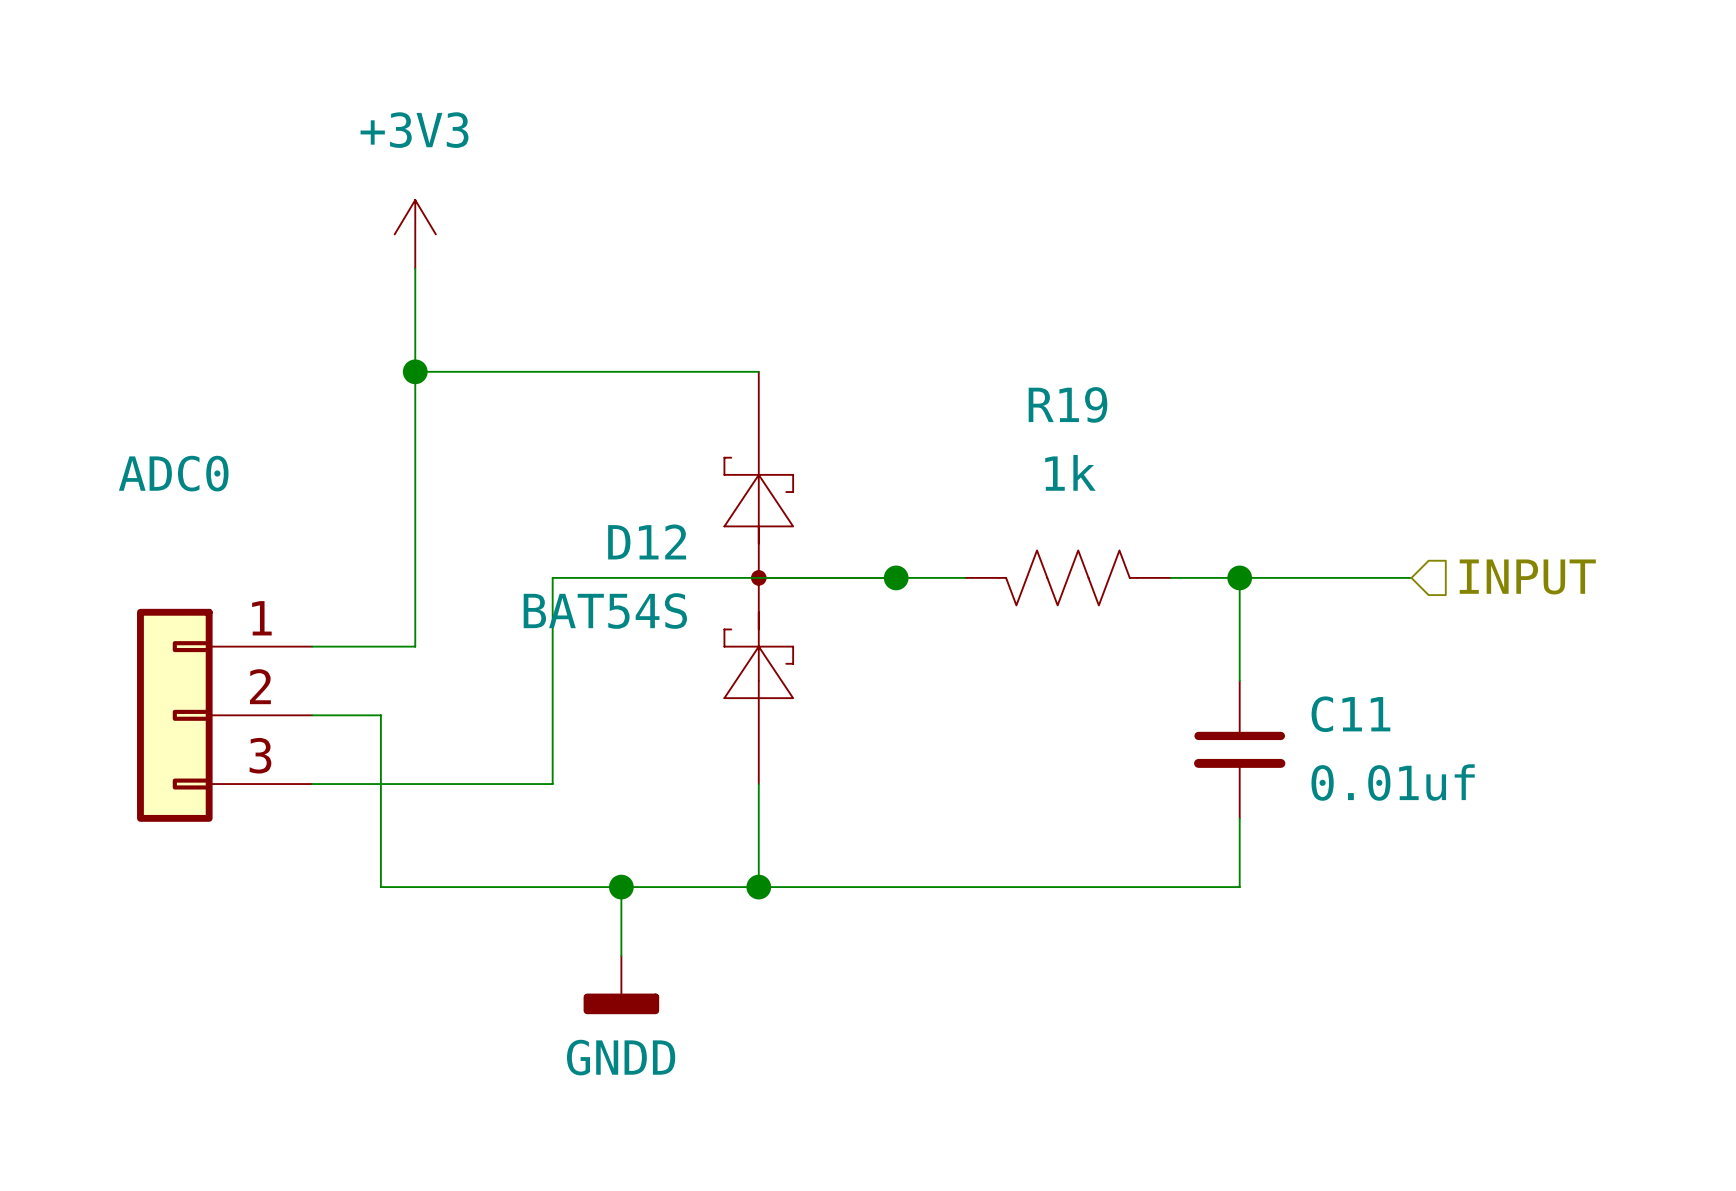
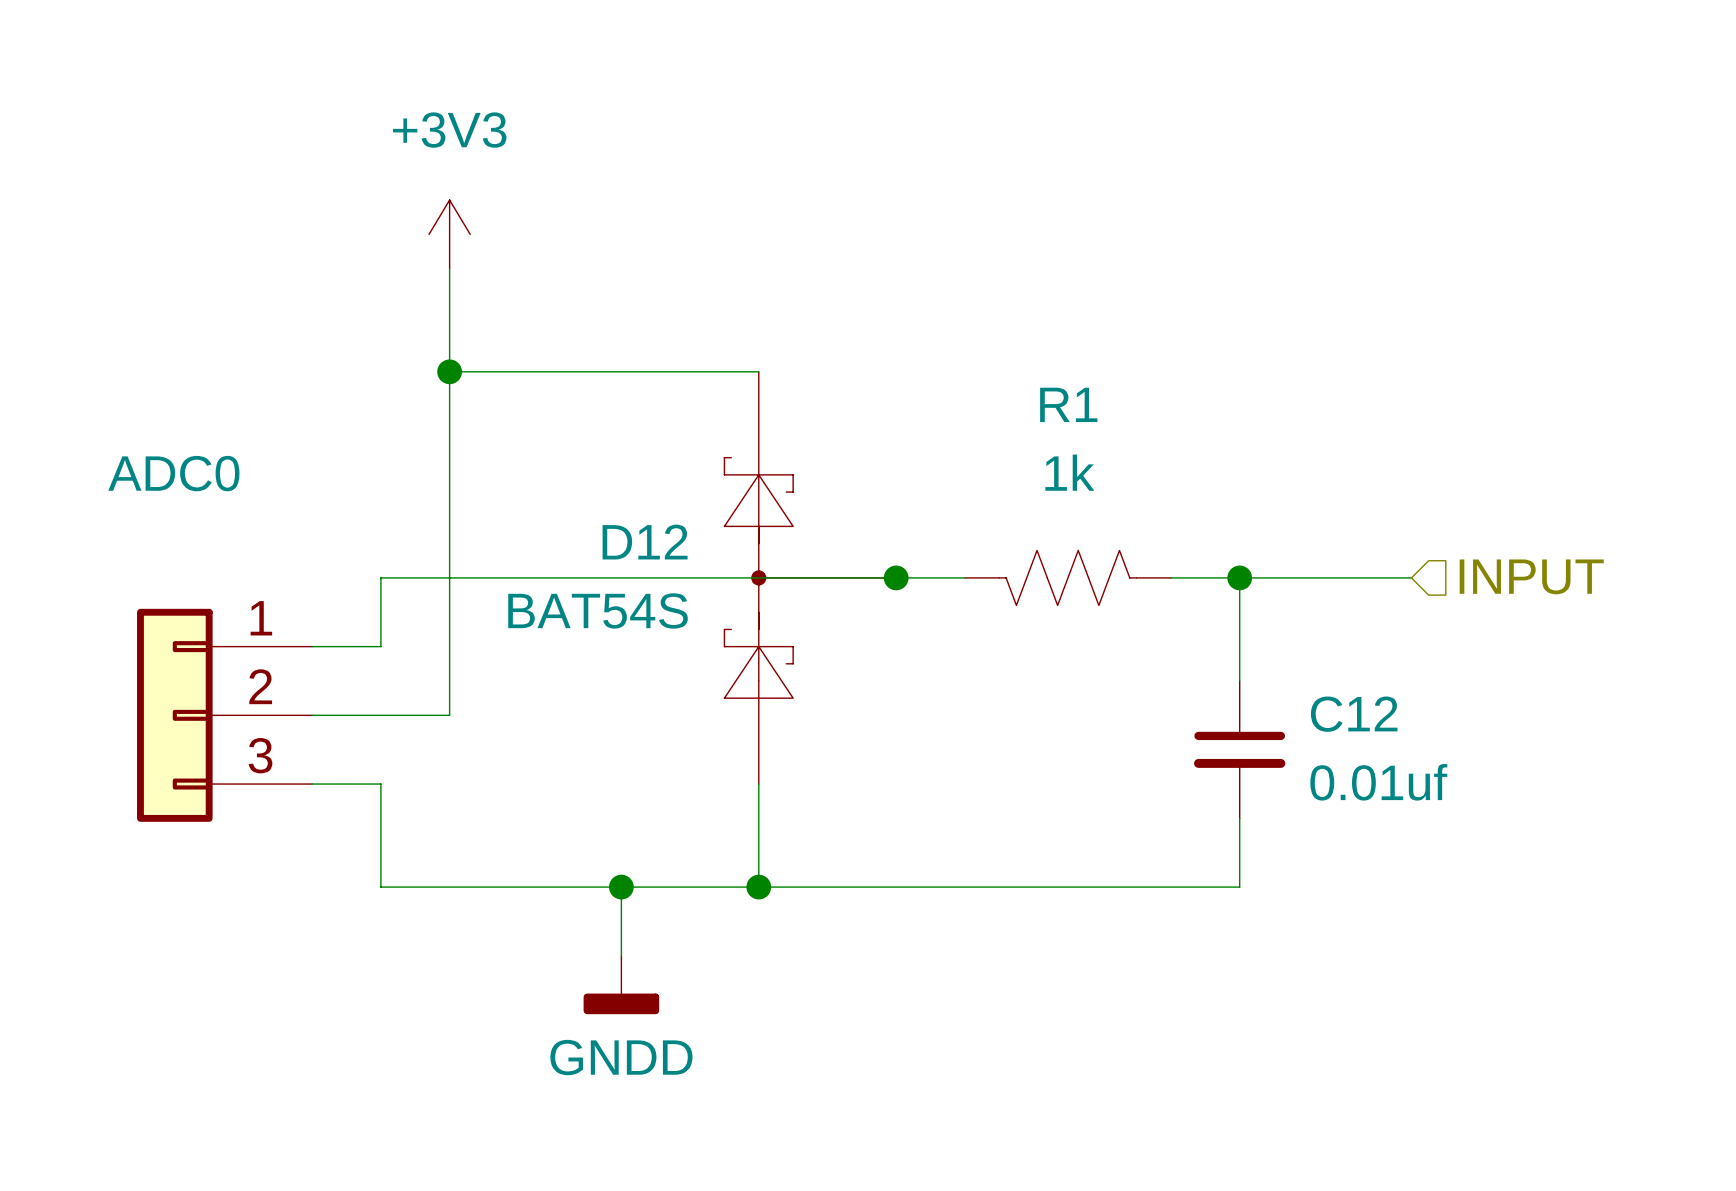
power symbol position: +3V3 (415, 234) -> +3V3 (449, 234)
wire: (415, 268) (415, 646) (380, 646) -> none
wire: none -> (449, 268) (449, 715) (380, 715)
wire: (415, 371) (449, 371) -> none
junction position: (415, 371) -> (449, 371)
R19 name: R19 (1067, 404) -> R1 (1068, 404)
wire: (552, 577) (552, 784) (380, 784) (380, 715) -> (552, 577) (380, 577) (380, 646)
C11 name: C11 (1350, 714) -> C12 (1354, 714)

